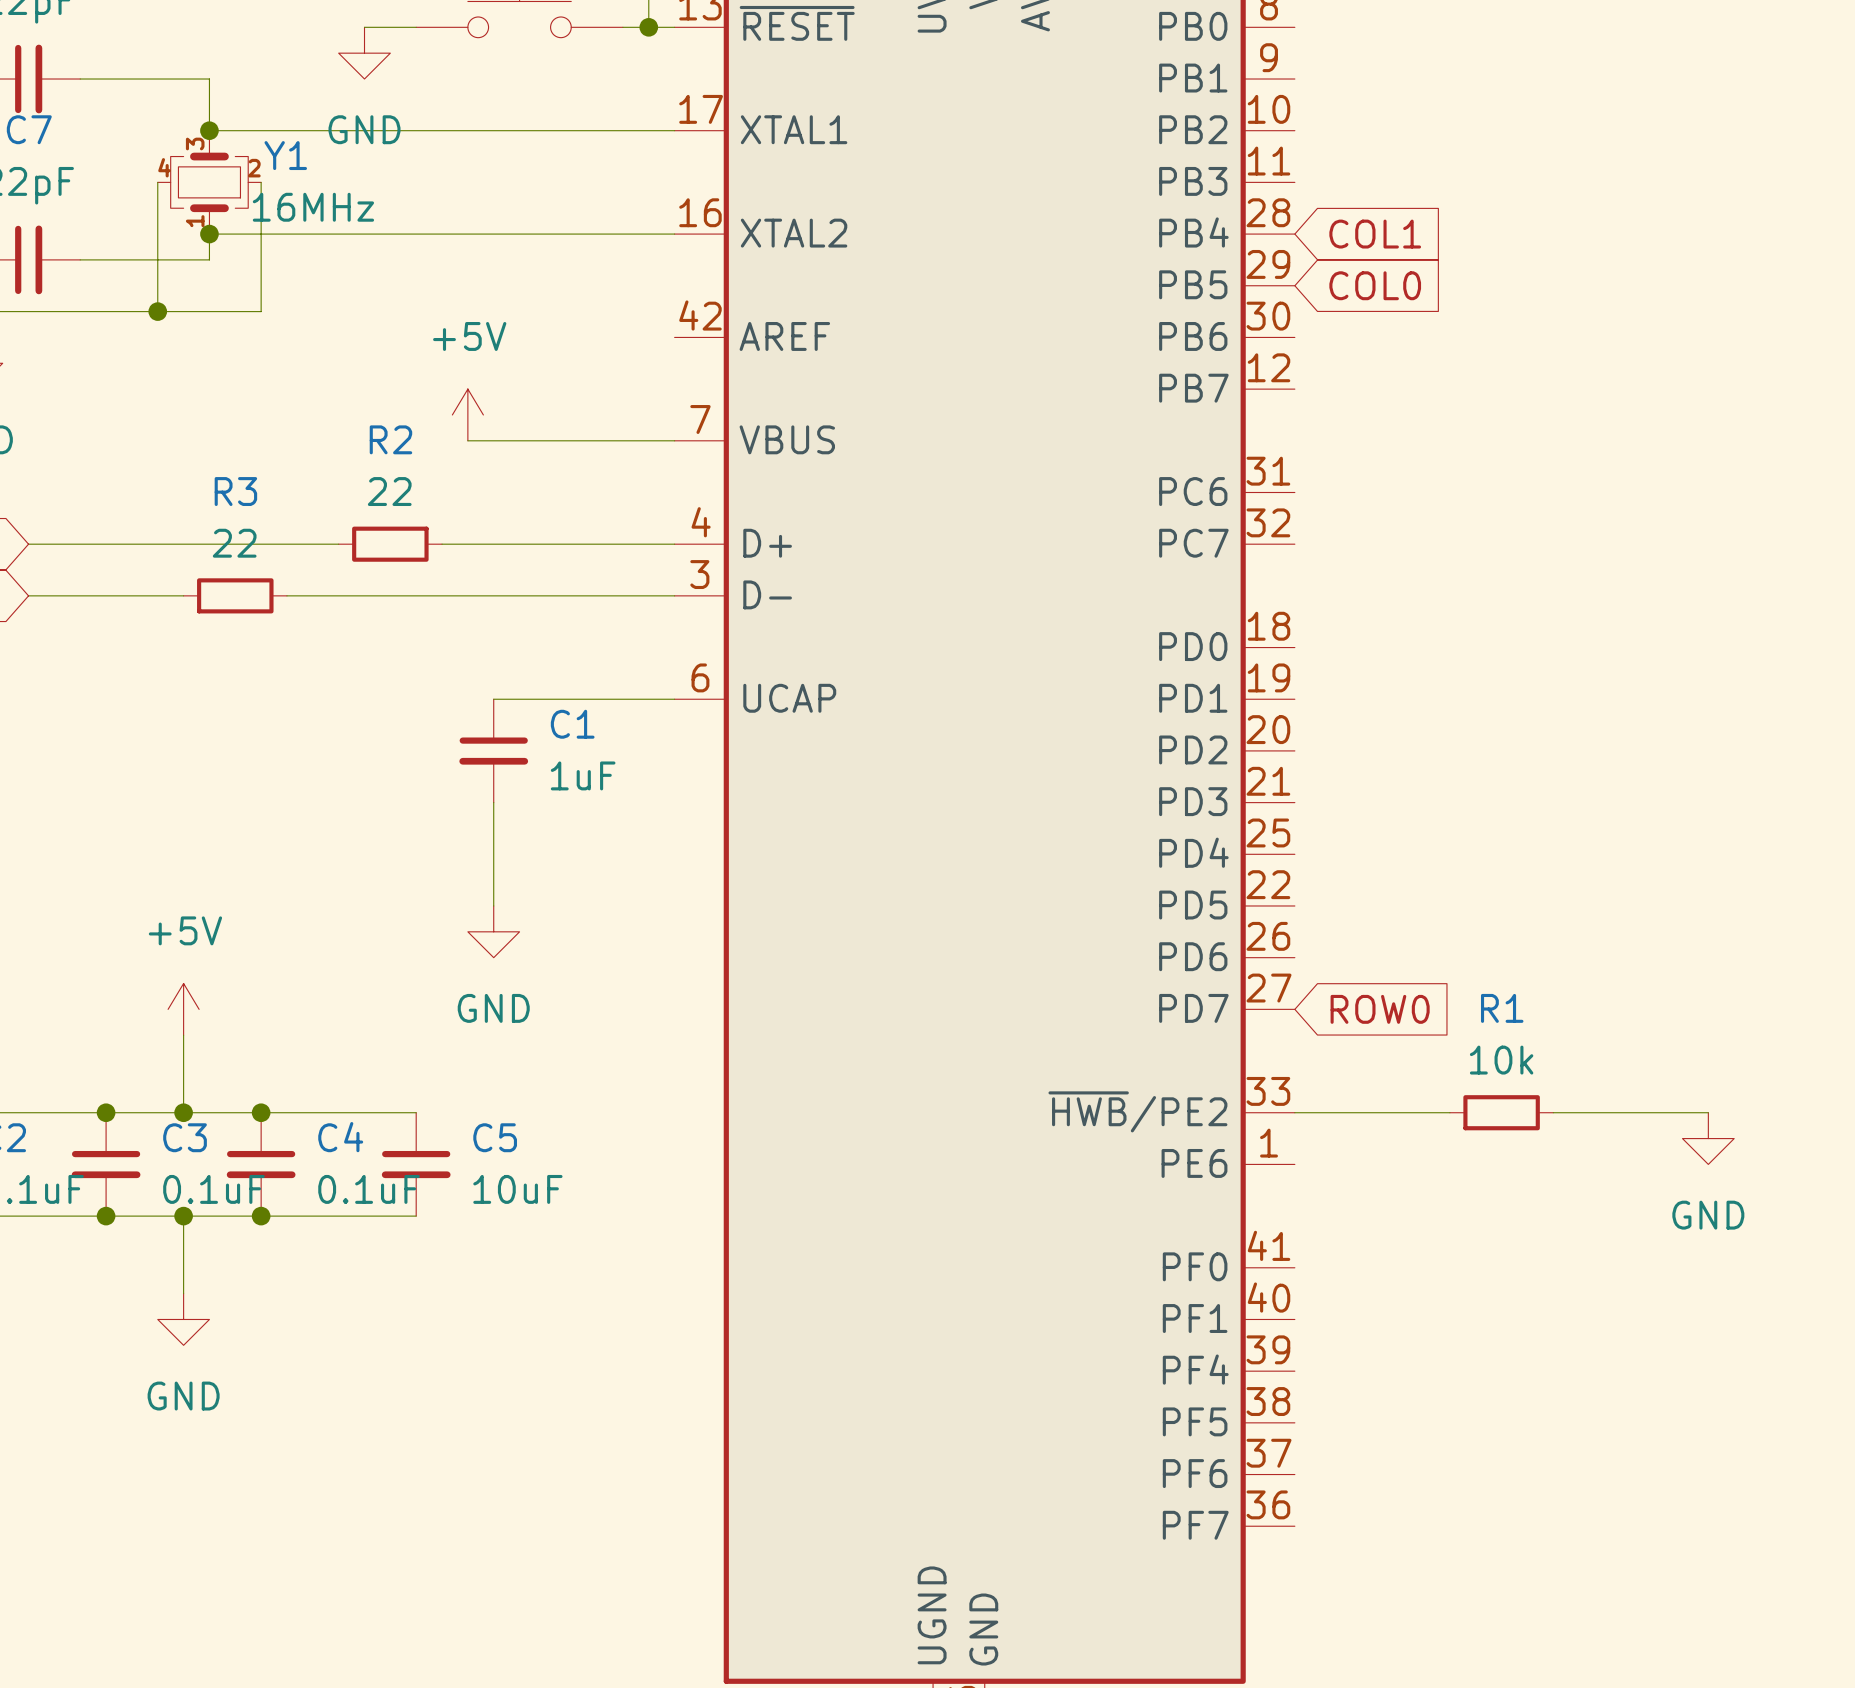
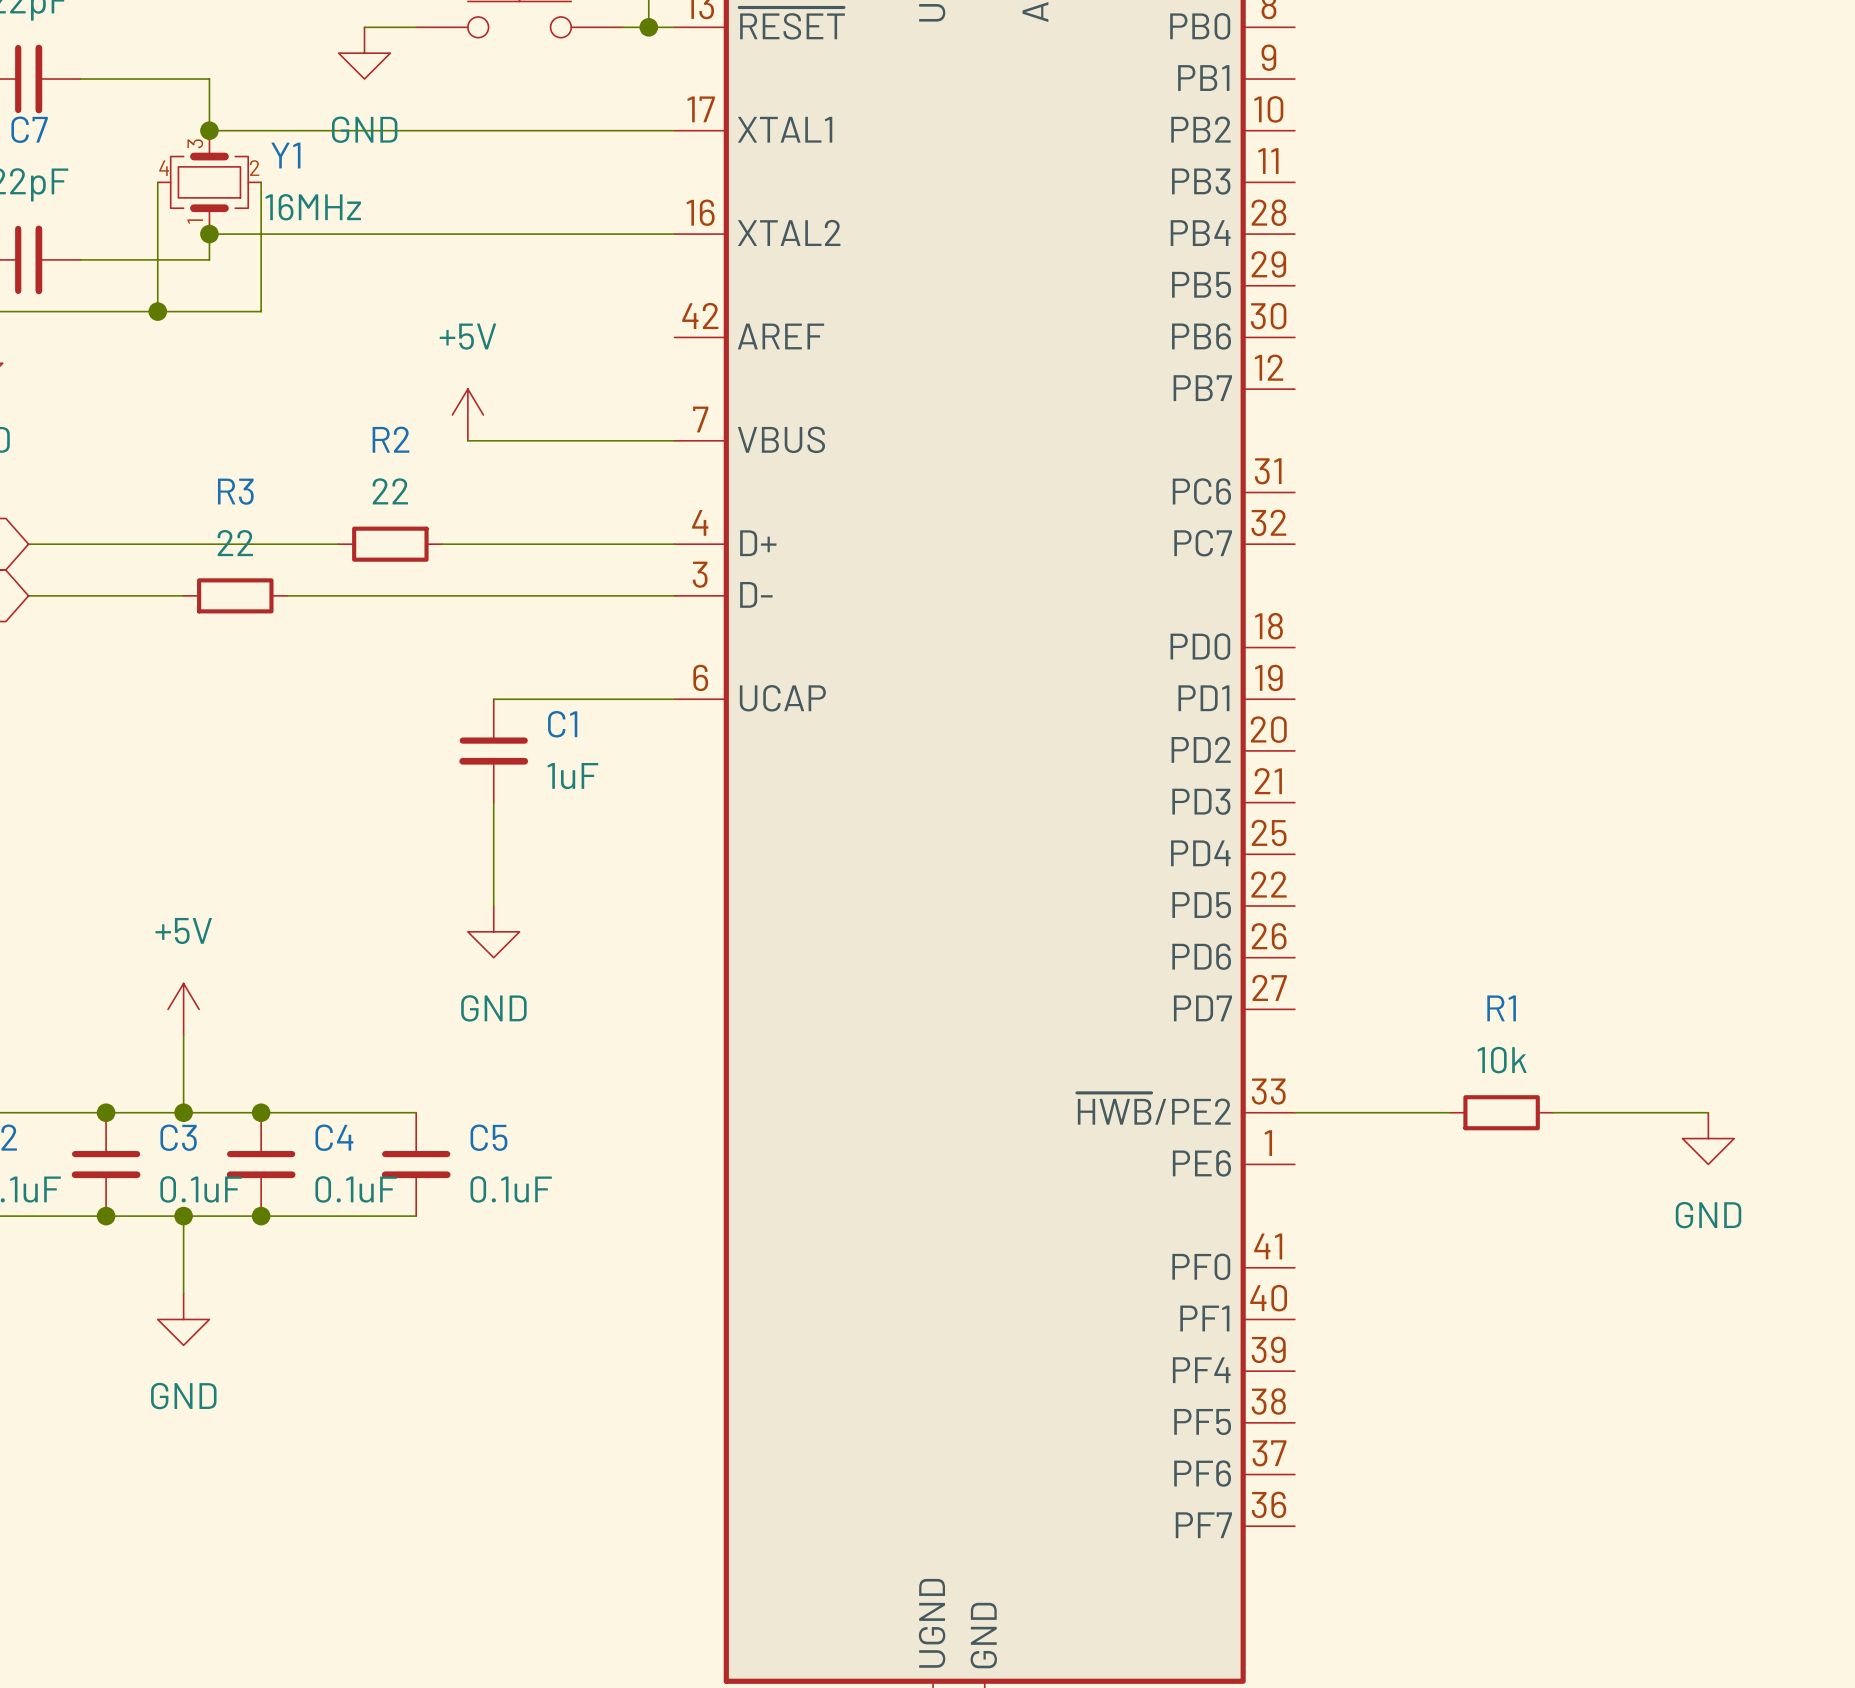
global label: COL1 (1375, 234) -> none
global label: COL0 (1375, 285) -> none
global label: ROW0 (1380, 1009) -> none
C5 value: 10uF (517, 1189) -> 0.1uF (511, 1189)

